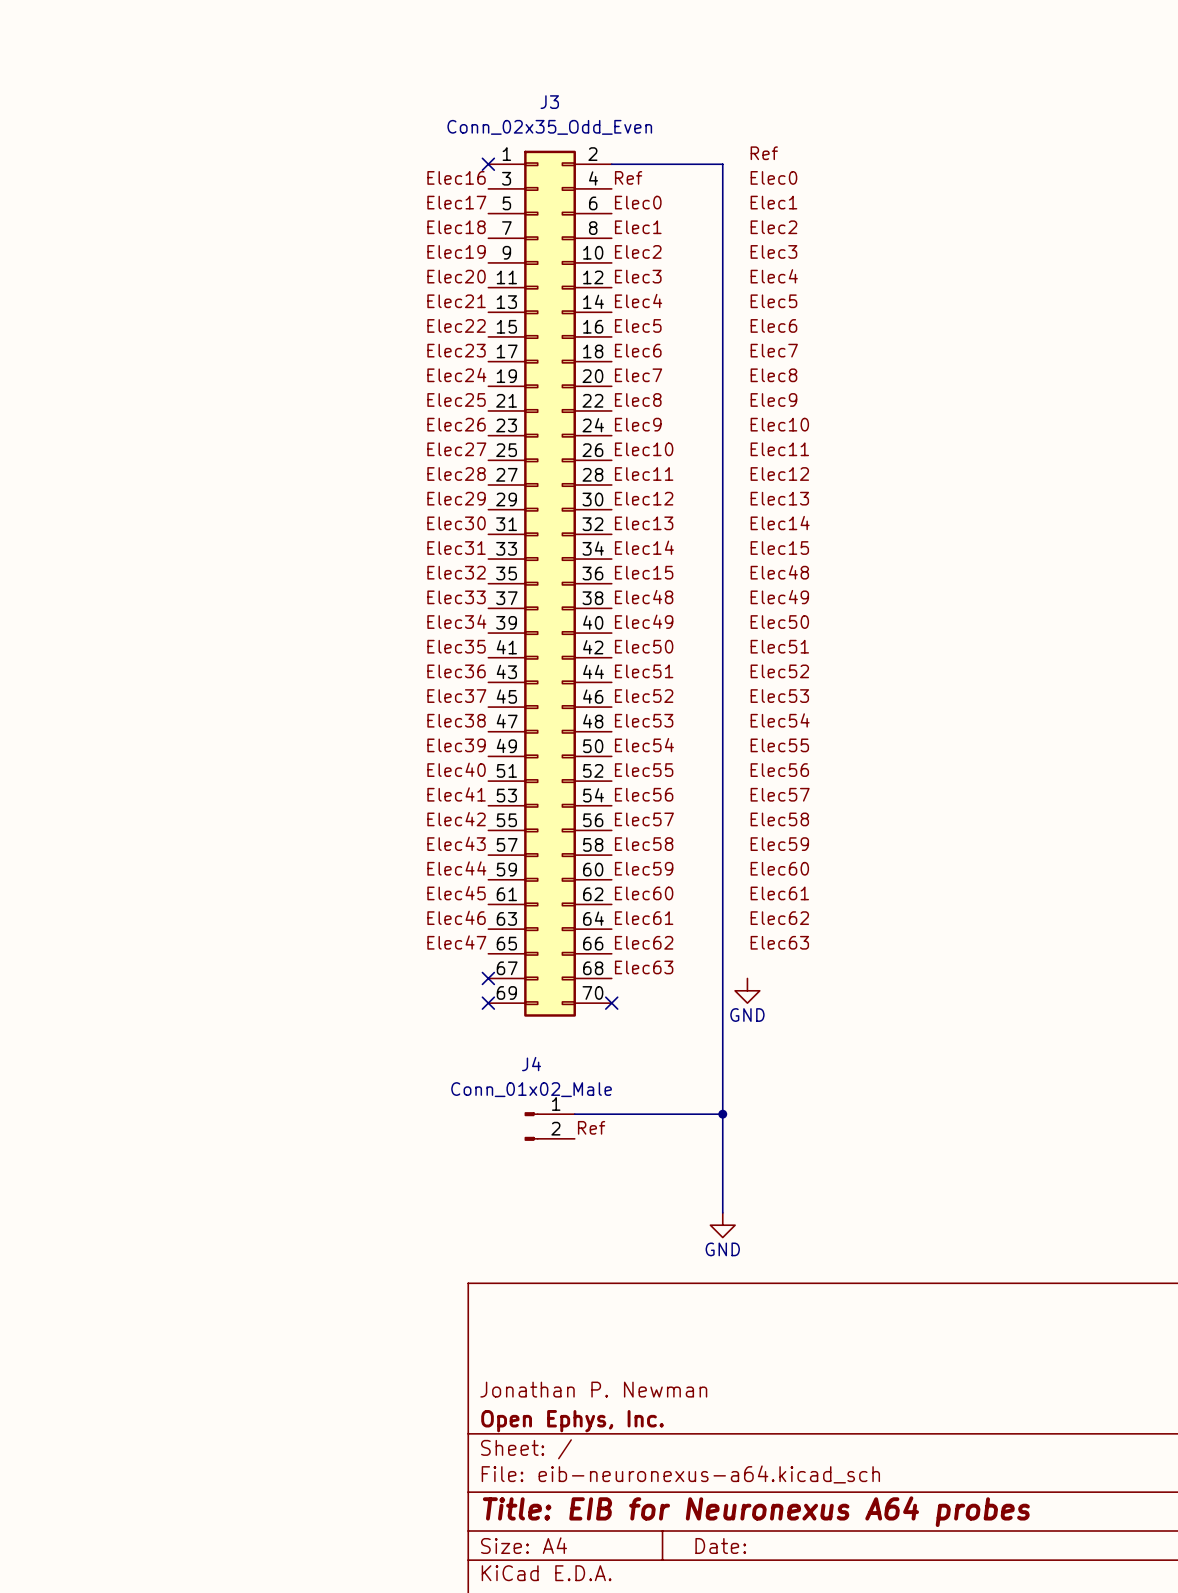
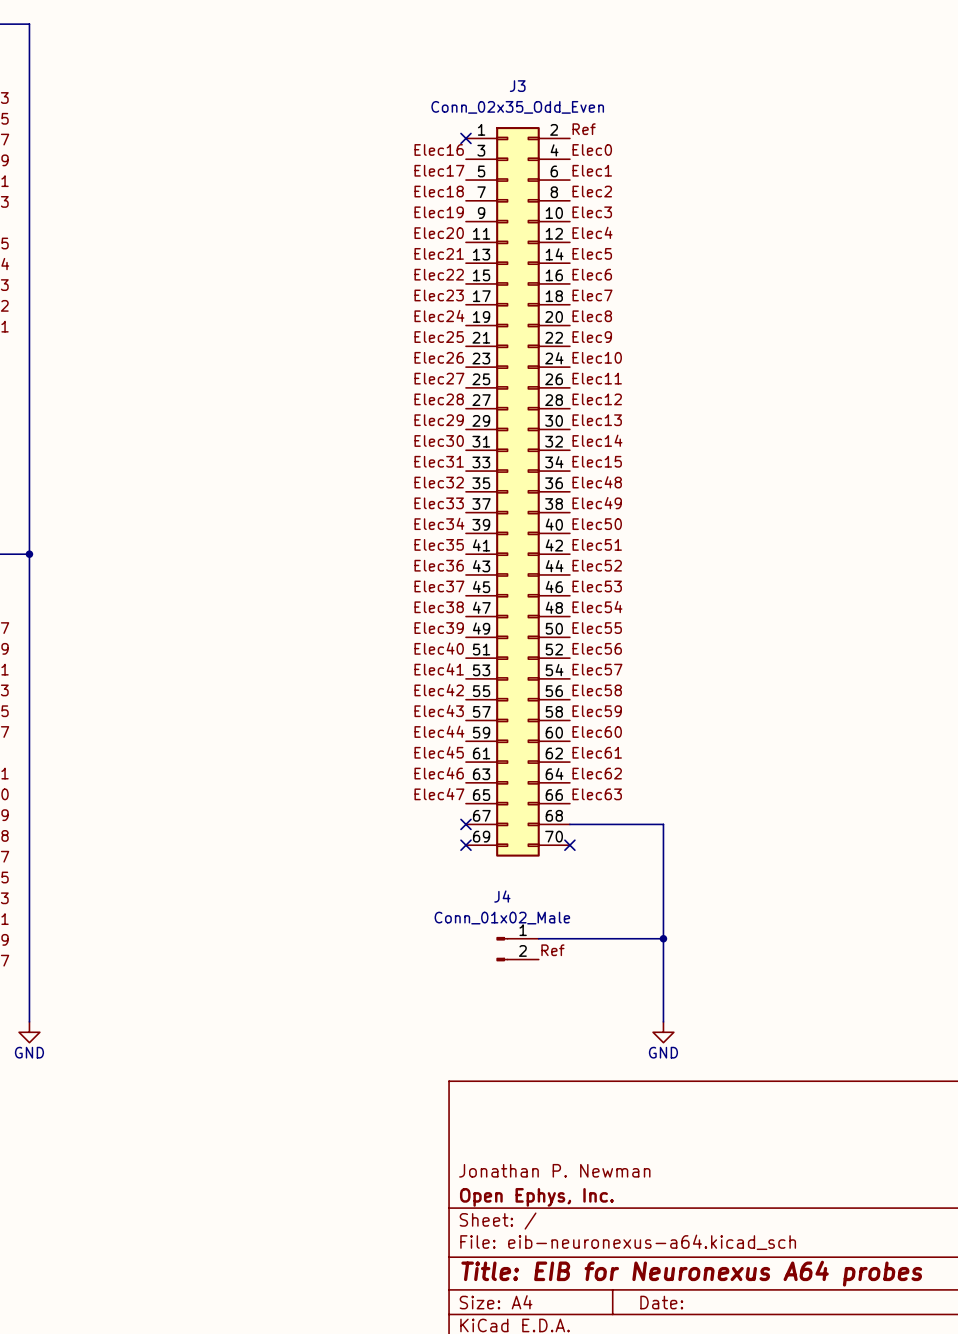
label position: Ref (764, 153) -> Ref (584, 129)
wire: (611, 164) (722, 164) (722, 978) -> (569, 824) (663, 824)
label: Ref (628, 177) -> Elec0 (592, 149)
label: Elec0 (773, 177) -> none
label: Elec0 (638, 202) -> Elec1 (592, 170)
label: Elec1 (773, 202) -> none
label: Elec1 (638, 227) -> Elec2 (592, 191)
label: Elec2 (773, 227) -> none
label: Elec2 (638, 251) -> Elec3 (592, 212)
label: Elec3 (773, 251) -> none
label: Elec3 (638, 276) -> Elec4 (592, 232)
label: Elec4 (774, 276) -> none
label: Elec4 (638, 300) -> Elec5 (592, 253)
label: Elec5 (773, 301) -> none
label: Elec5 (638, 325) -> Elec6 (592, 274)
label: Elec6 (773, 325) -> none
label: Elec6 (638, 350) -> Elec7 (592, 295)
label: Elec7 (774, 350) -> none
label: Elec7 (638, 375) -> Elec8 (592, 316)
label: Elec8 (773, 375) -> none
label: Elec8 (638, 399) -> Elec9 (592, 337)
label: Elec9 (773, 399) -> none
label: Elec9 (638, 424) -> Elec10 (597, 357)
label: Elec10 (779, 424) -> none
label: Elec10 (644, 449) -> Elec11 (597, 378)
label: Elec11 (779, 449) -> none
label: Elec11 (644, 473) -> Elec12 (597, 399)
label: Elec12 (779, 473) -> none
label: Elec12 (644, 498) -> Elec13 (597, 420)
label: Elec13 (779, 498) -> none
label: Elec13 (644, 523) -> Elec14 (597, 440)
label: Elec14 (780, 523) -> none
label: Elec14 (644, 547) -> Elec15 (597, 461)
label: Elec15 (779, 548) -> none
label: Elec15 (644, 572) -> Elec48 (597, 482)
label: Elec48 (779, 572) -> none
label: Elec48 (644, 597) -> Elec49 (597, 503)
label: Elec49 (779, 597) -> none
label: Elec49 (644, 621) -> Elec50 (597, 524)
label: Elec50 (779, 622) -> none
label: Elec50 (644, 646) -> Elec51 (597, 544)
label: Elec51 (779, 646) -> none
label: Elec51 (644, 671) -> Elec52 (597, 565)
label: Elec52 (779, 671) -> none
label: Elec52 (644, 696) -> Elec53 (597, 586)
label: Elec53 (779, 696) -> none
label: Elec53 (644, 720) -> Elec54 (597, 607)
label: Elec54 (780, 720) -> none
label: Elec54 (644, 745) -> Elec55 (597, 628)
label: Elec55 (779, 745) -> none
label: Elec55 (644, 770) -> Elec56 (597, 648)
label: Elec56 (779, 770) -> none
label: Elec56 (644, 794) -> Elec57 (597, 669)
label: Elec57 (780, 794) -> none
label: Elec57 (644, 819) -> Elec58 (597, 690)
label: Elec58 (779, 819) -> none
label: Elec58 (644, 844) -> Elec59 (597, 711)
label: Elec59 (779, 844) -> none
label: Elec59 (644, 868) -> Elec60 (597, 732)
label: Elec60 (779, 868) -> none
label: Elec60 (644, 893) -> Elec61 (597, 752)
label: Elec61 (779, 893) -> none
label: Elec61 (644, 918) -> Elec62 (597, 773)
label: Elec62 (779, 918) -> none
label: Elec62 (644, 942) -> Elec63 (597, 794)
label: Elec63 (779, 942) -> none
label: Elec63 (644, 967) -> none
power symbol: GND (747, 990) -> none

